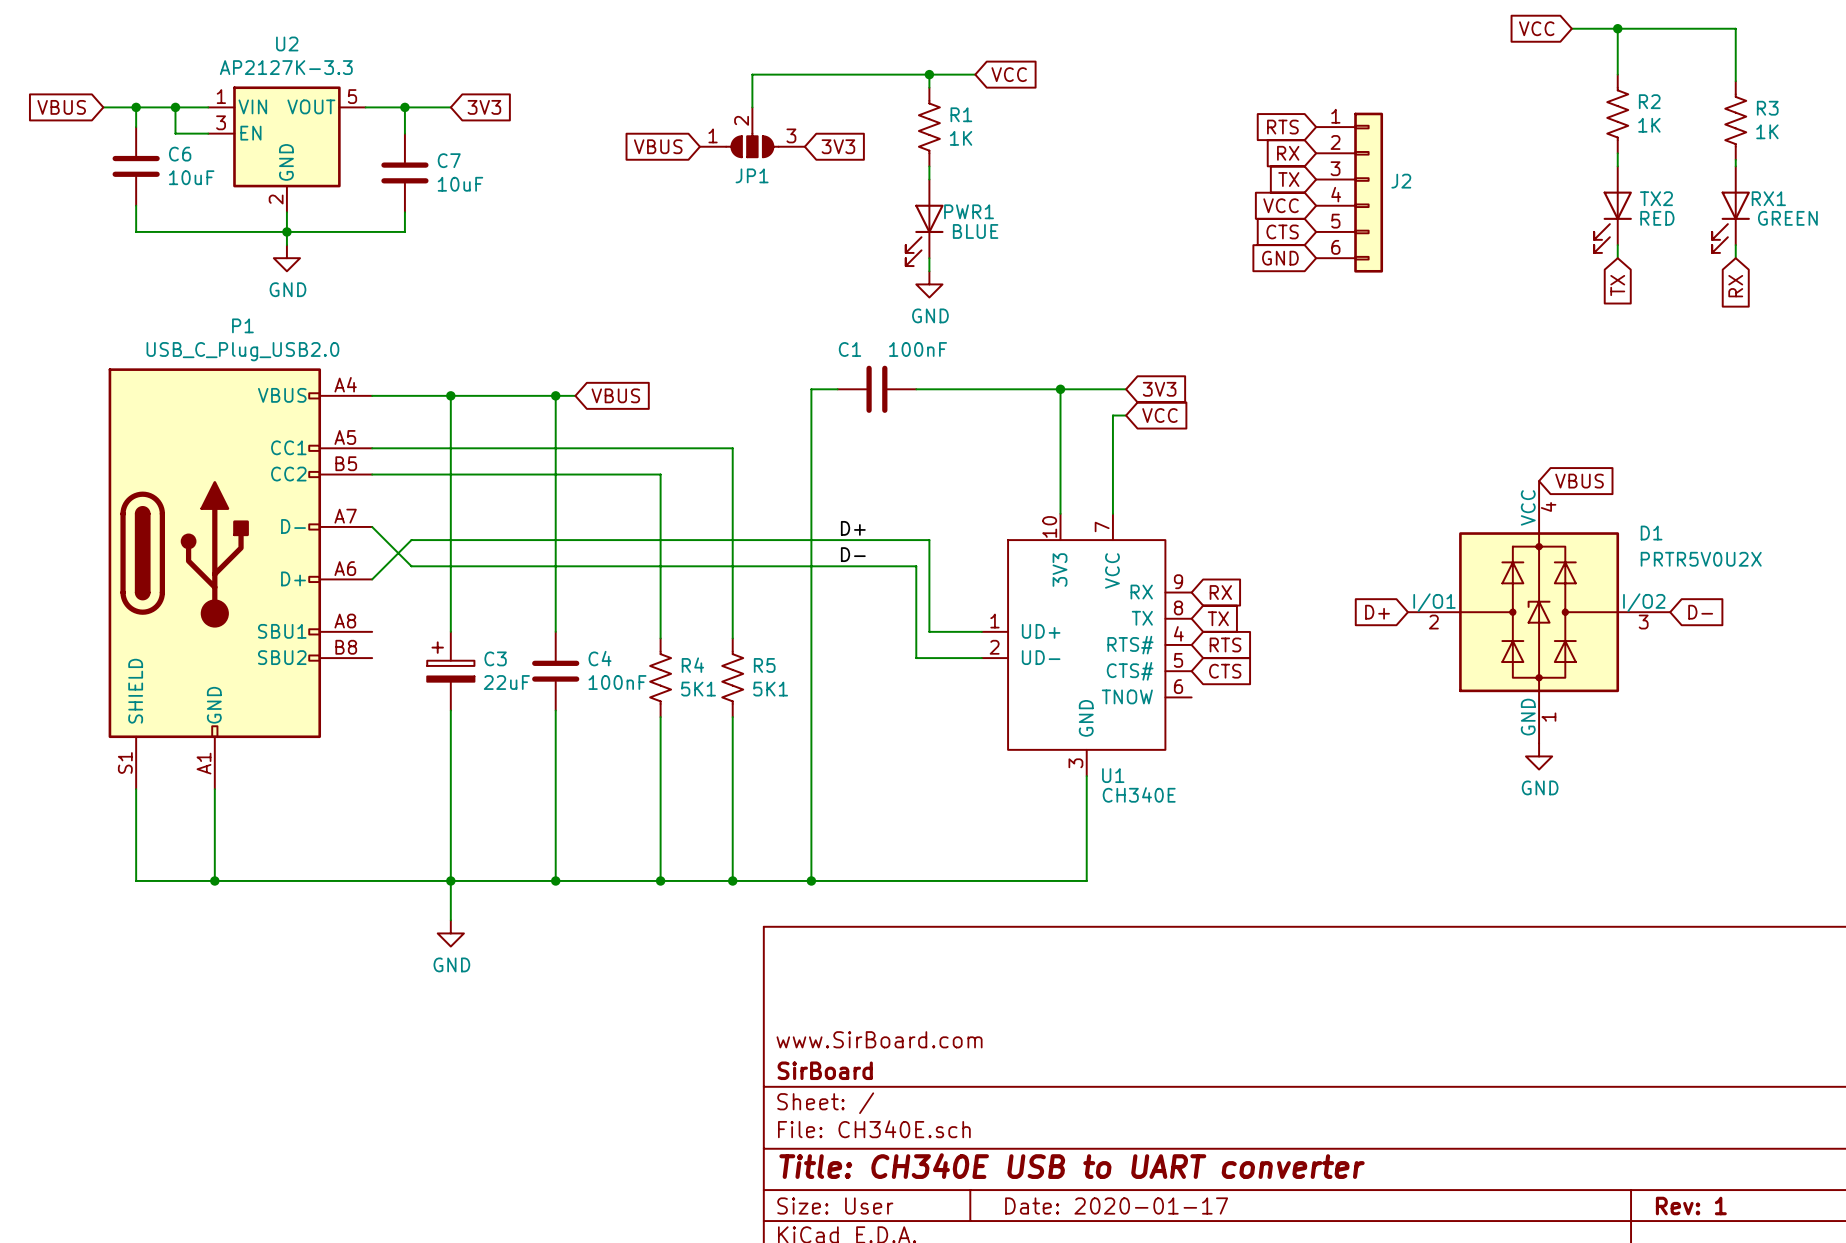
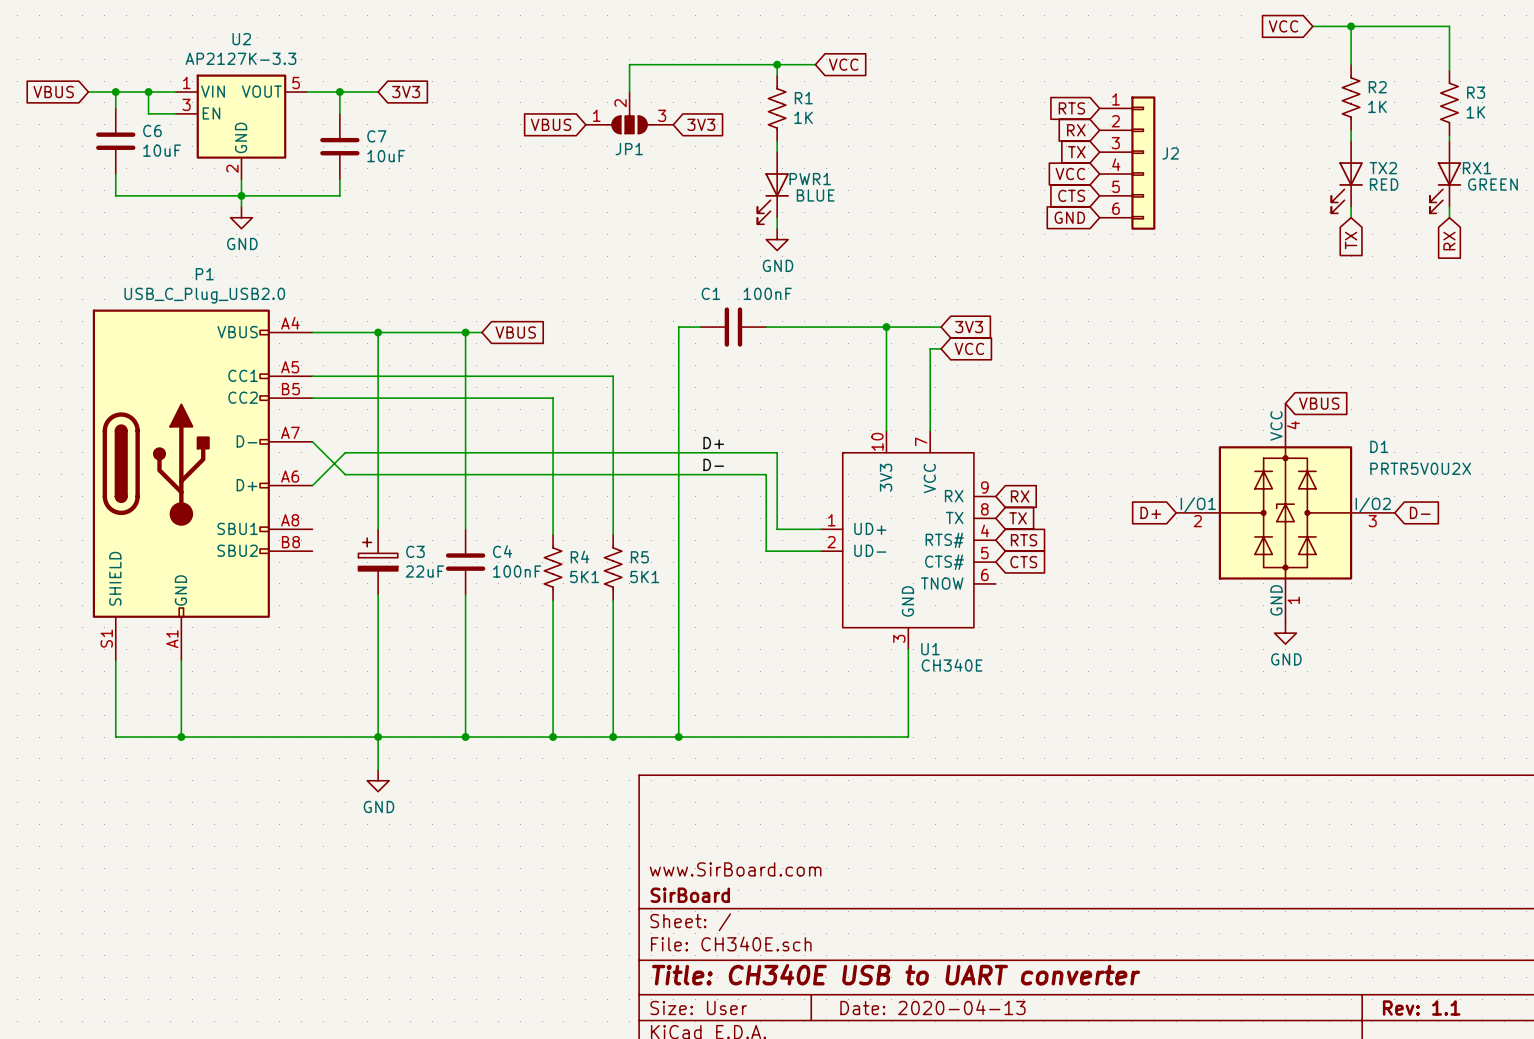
title block: Date: 2020-01-17 (1116, 1206) -> Date: 2020-04-13 (932, 1007)
title block: Rev: 1 (1691, 1206) -> Rev: 1.1 (1421, 1008)

